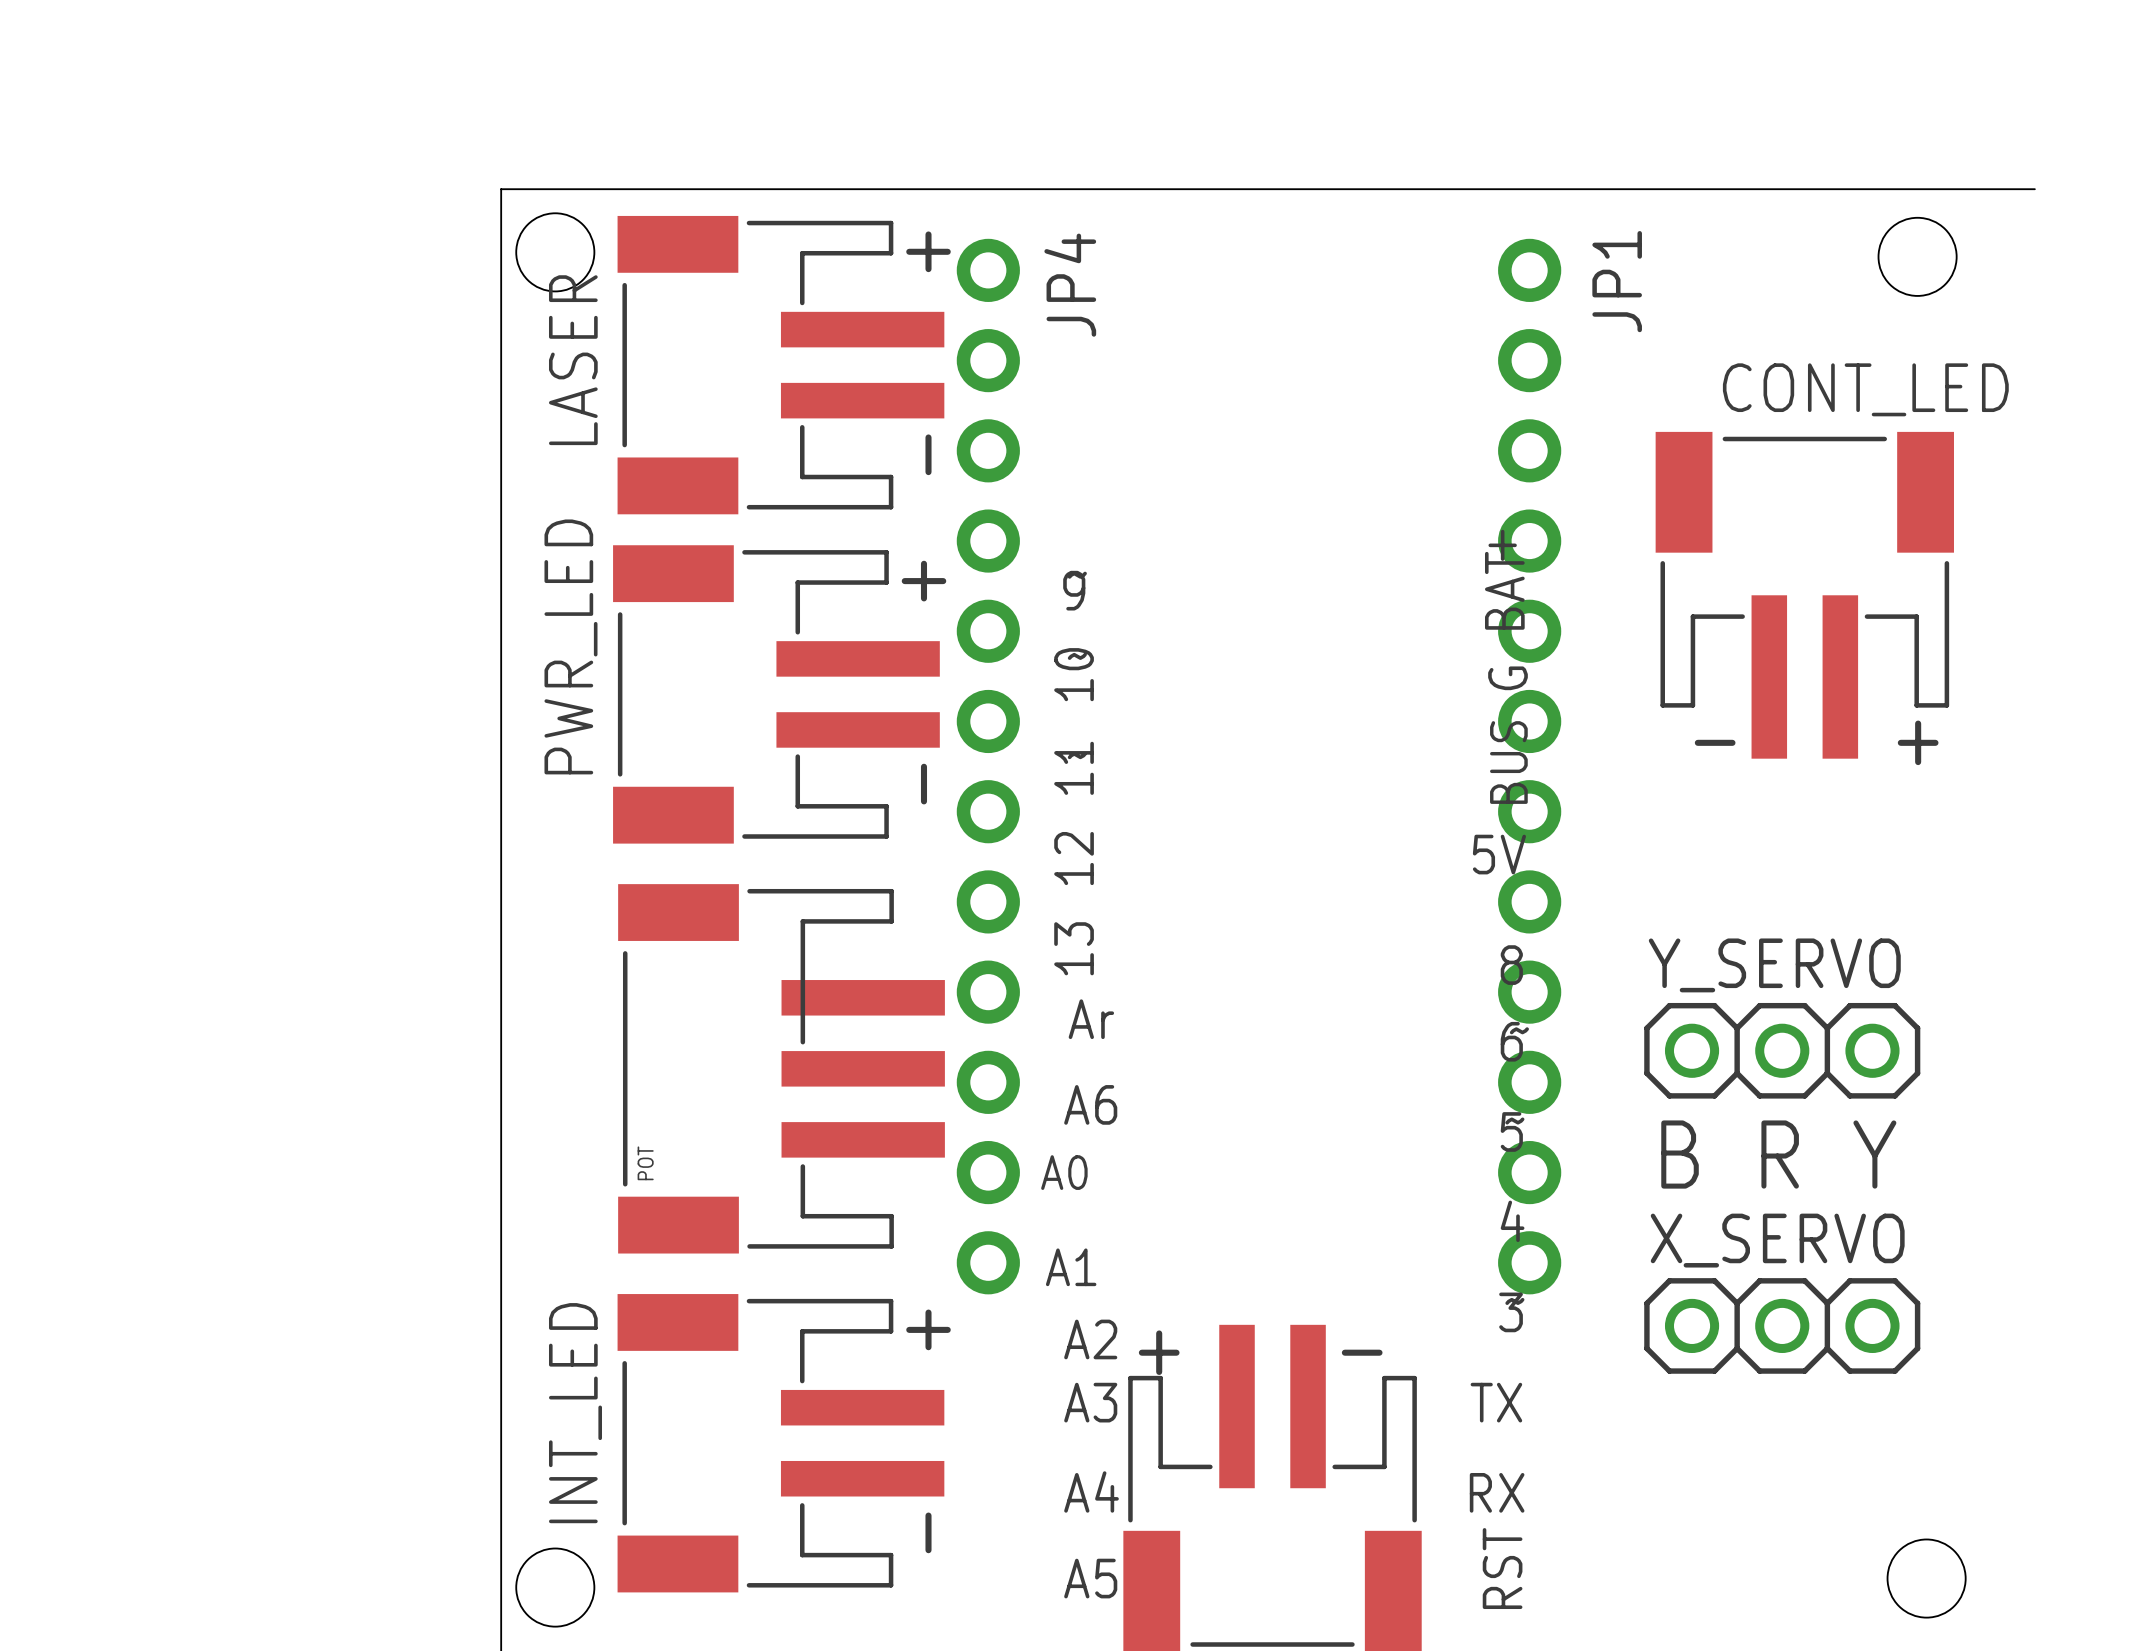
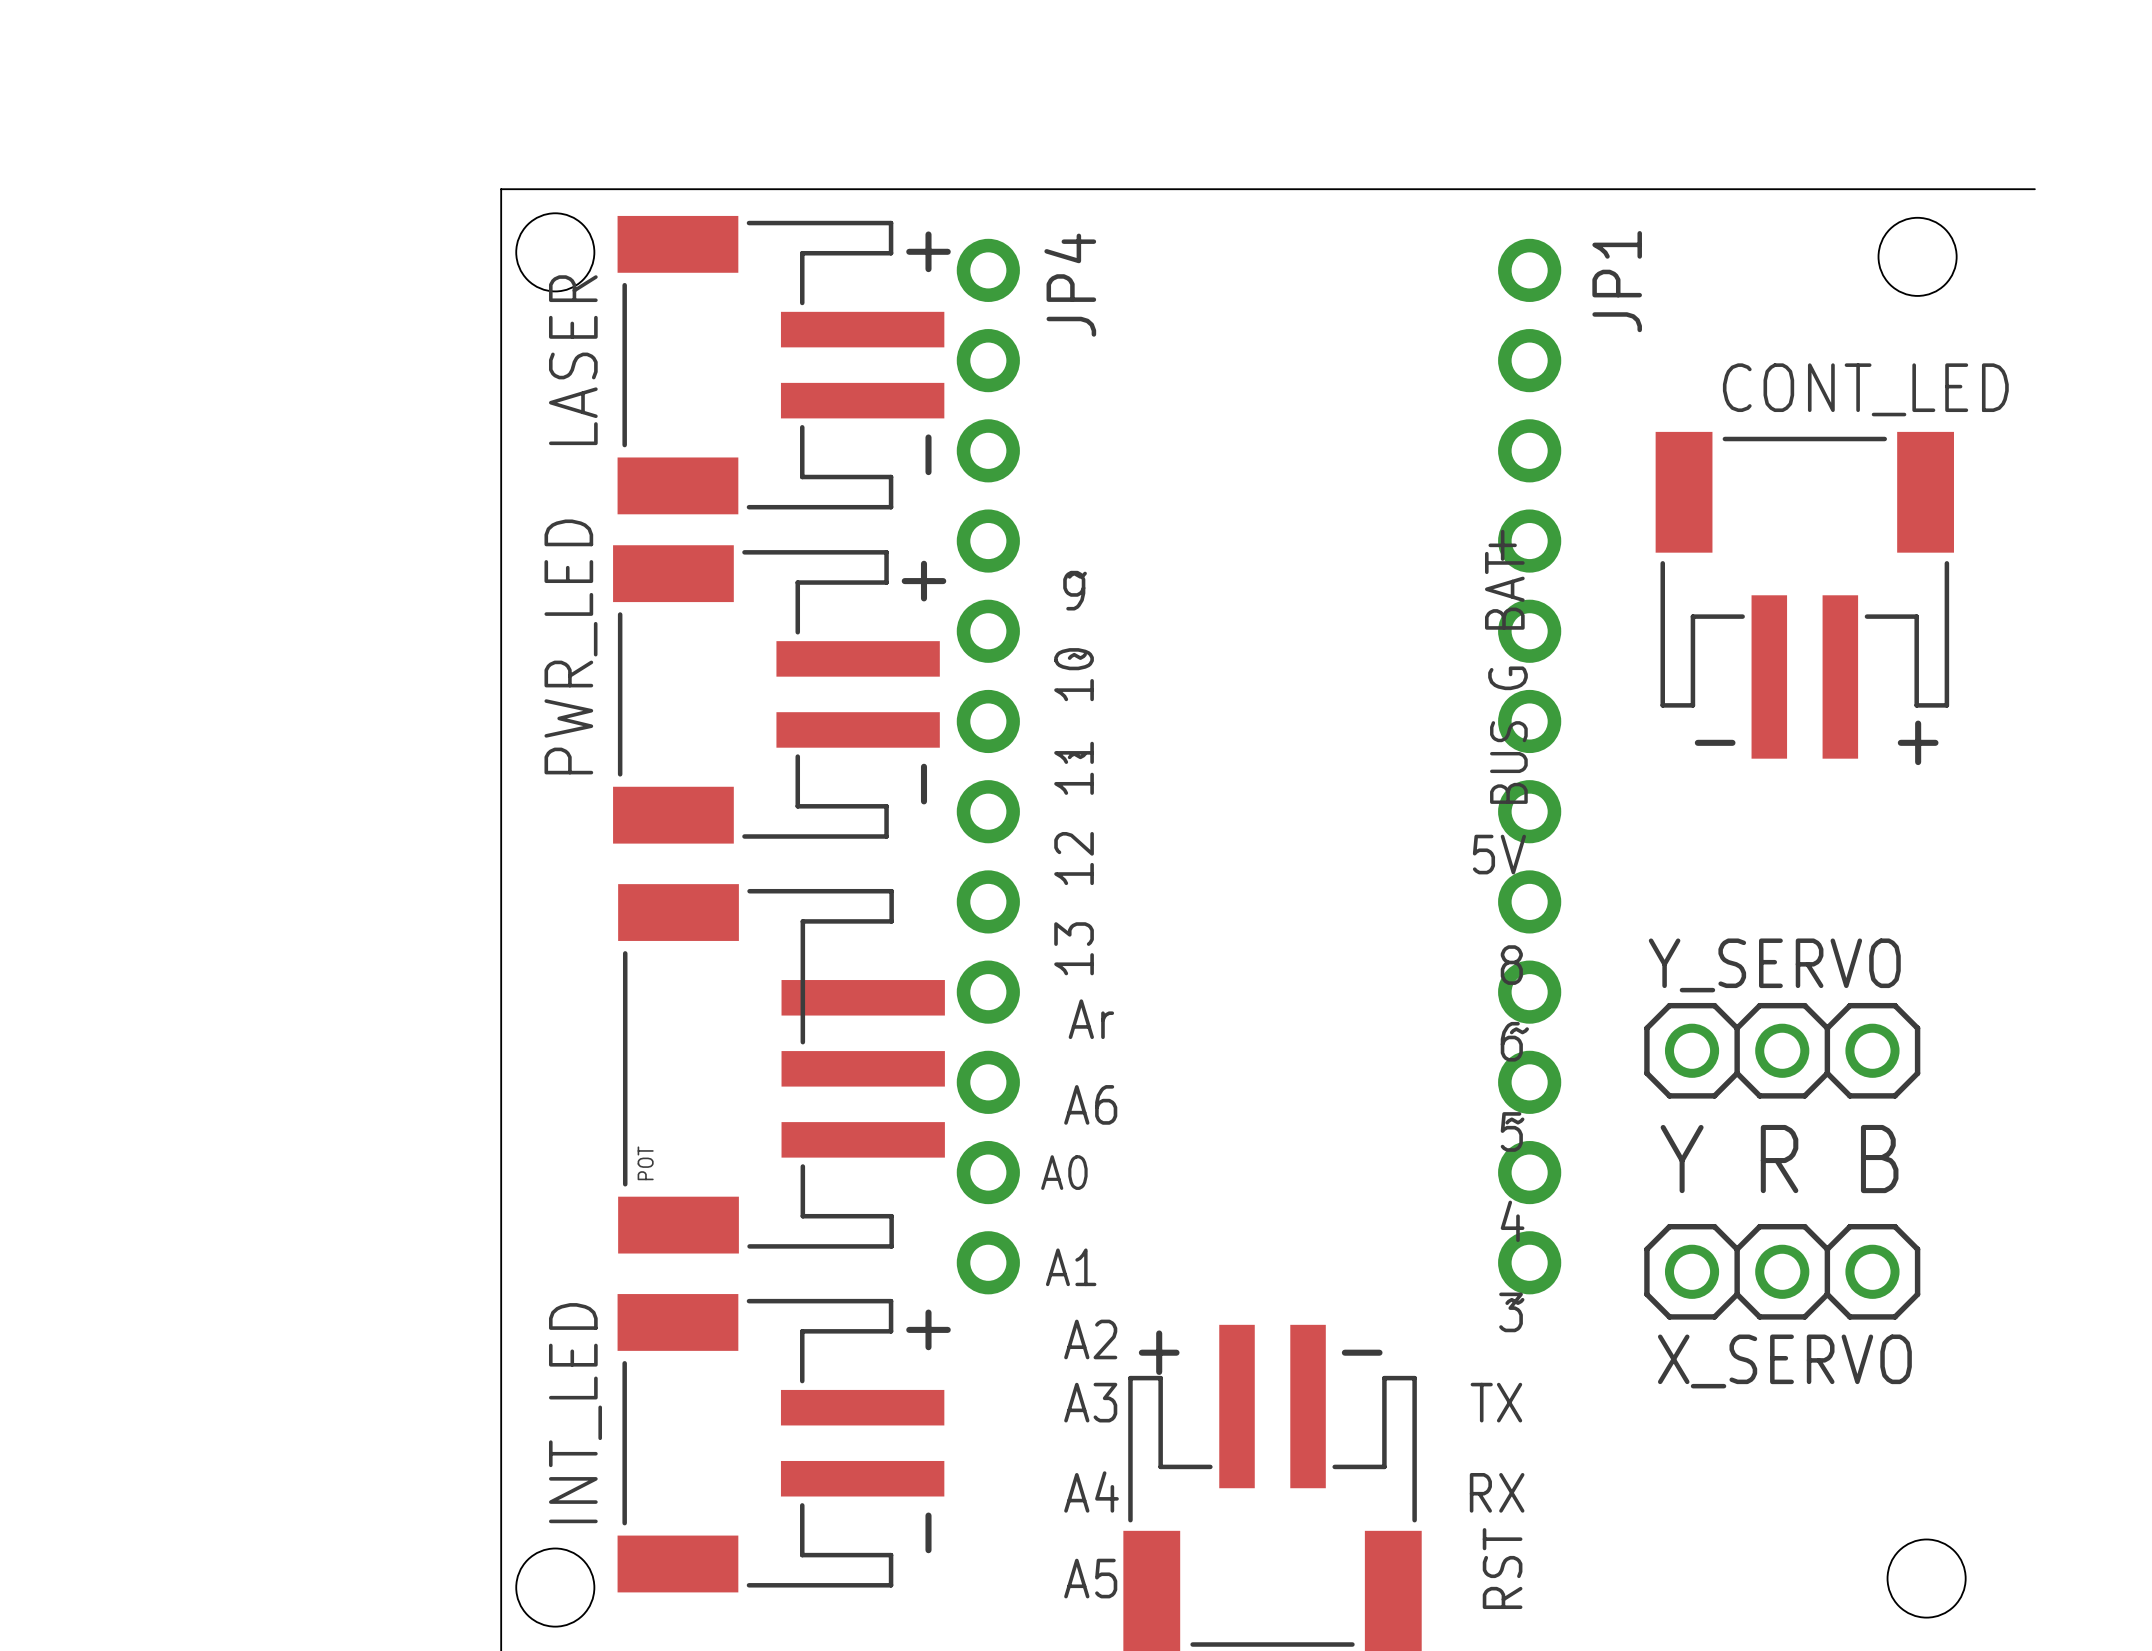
text: B R Y (1778, 1154) -> none
text: none -> Y R B (1779, 1159)
X_SERVO name position: X_SERVO (1777, 1240) -> X_SERVO (1784, 1361)
X_SERVO position: (1782, 1325) -> (1782, 1271)

